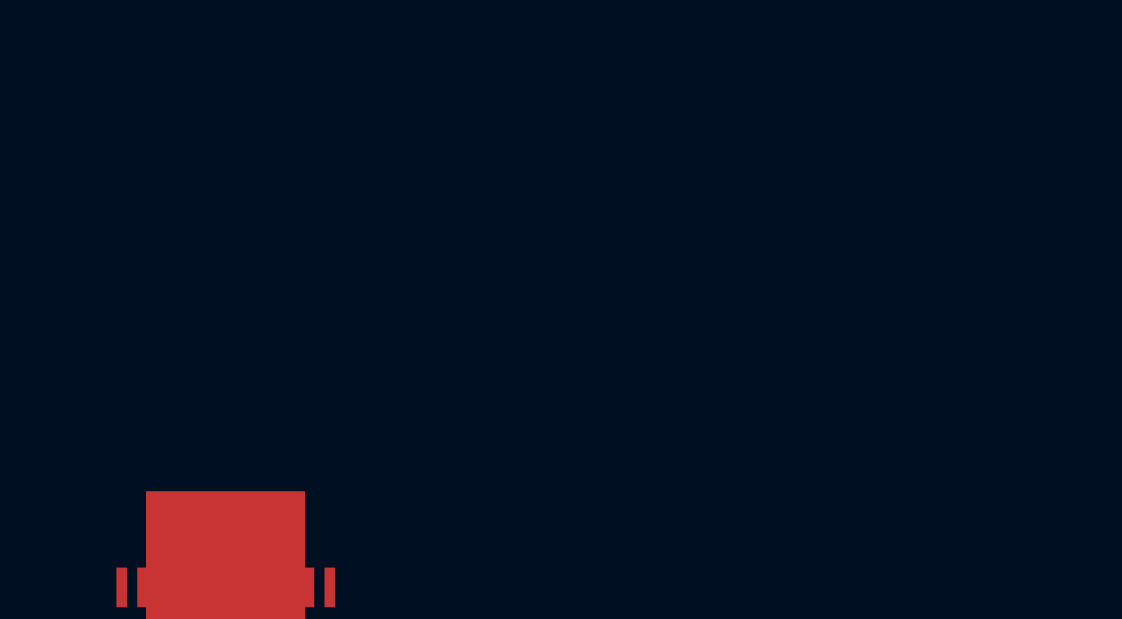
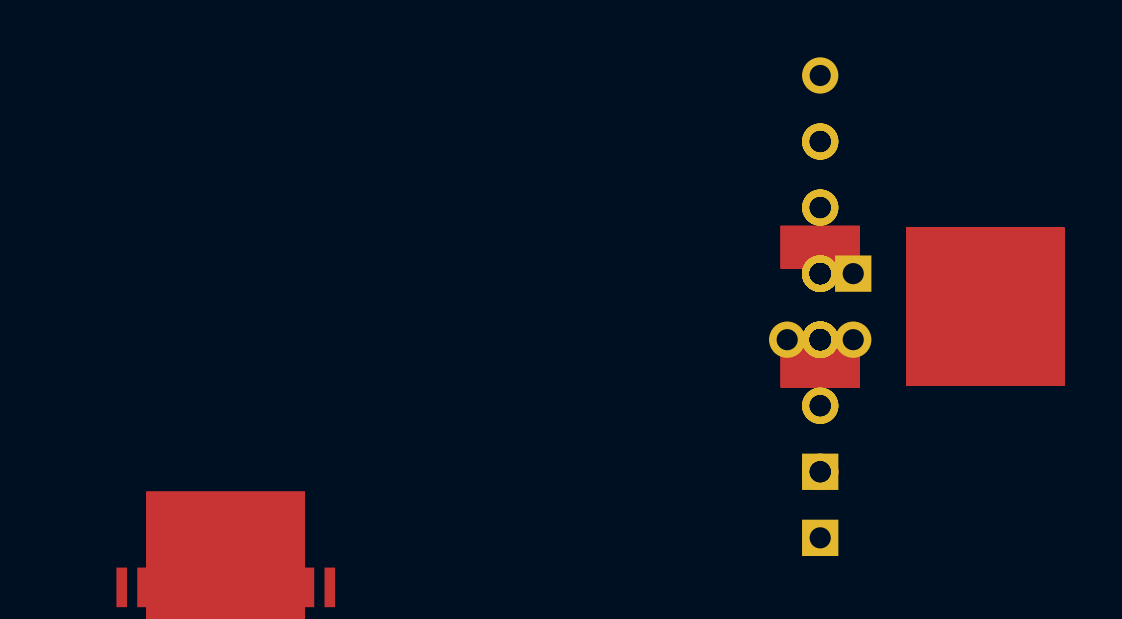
part: none -> (820, 306)
part: none -> (820, 306)
part: none -> (820, 306)
part: none -> (820, 306)
part: none -> (922, 306)

